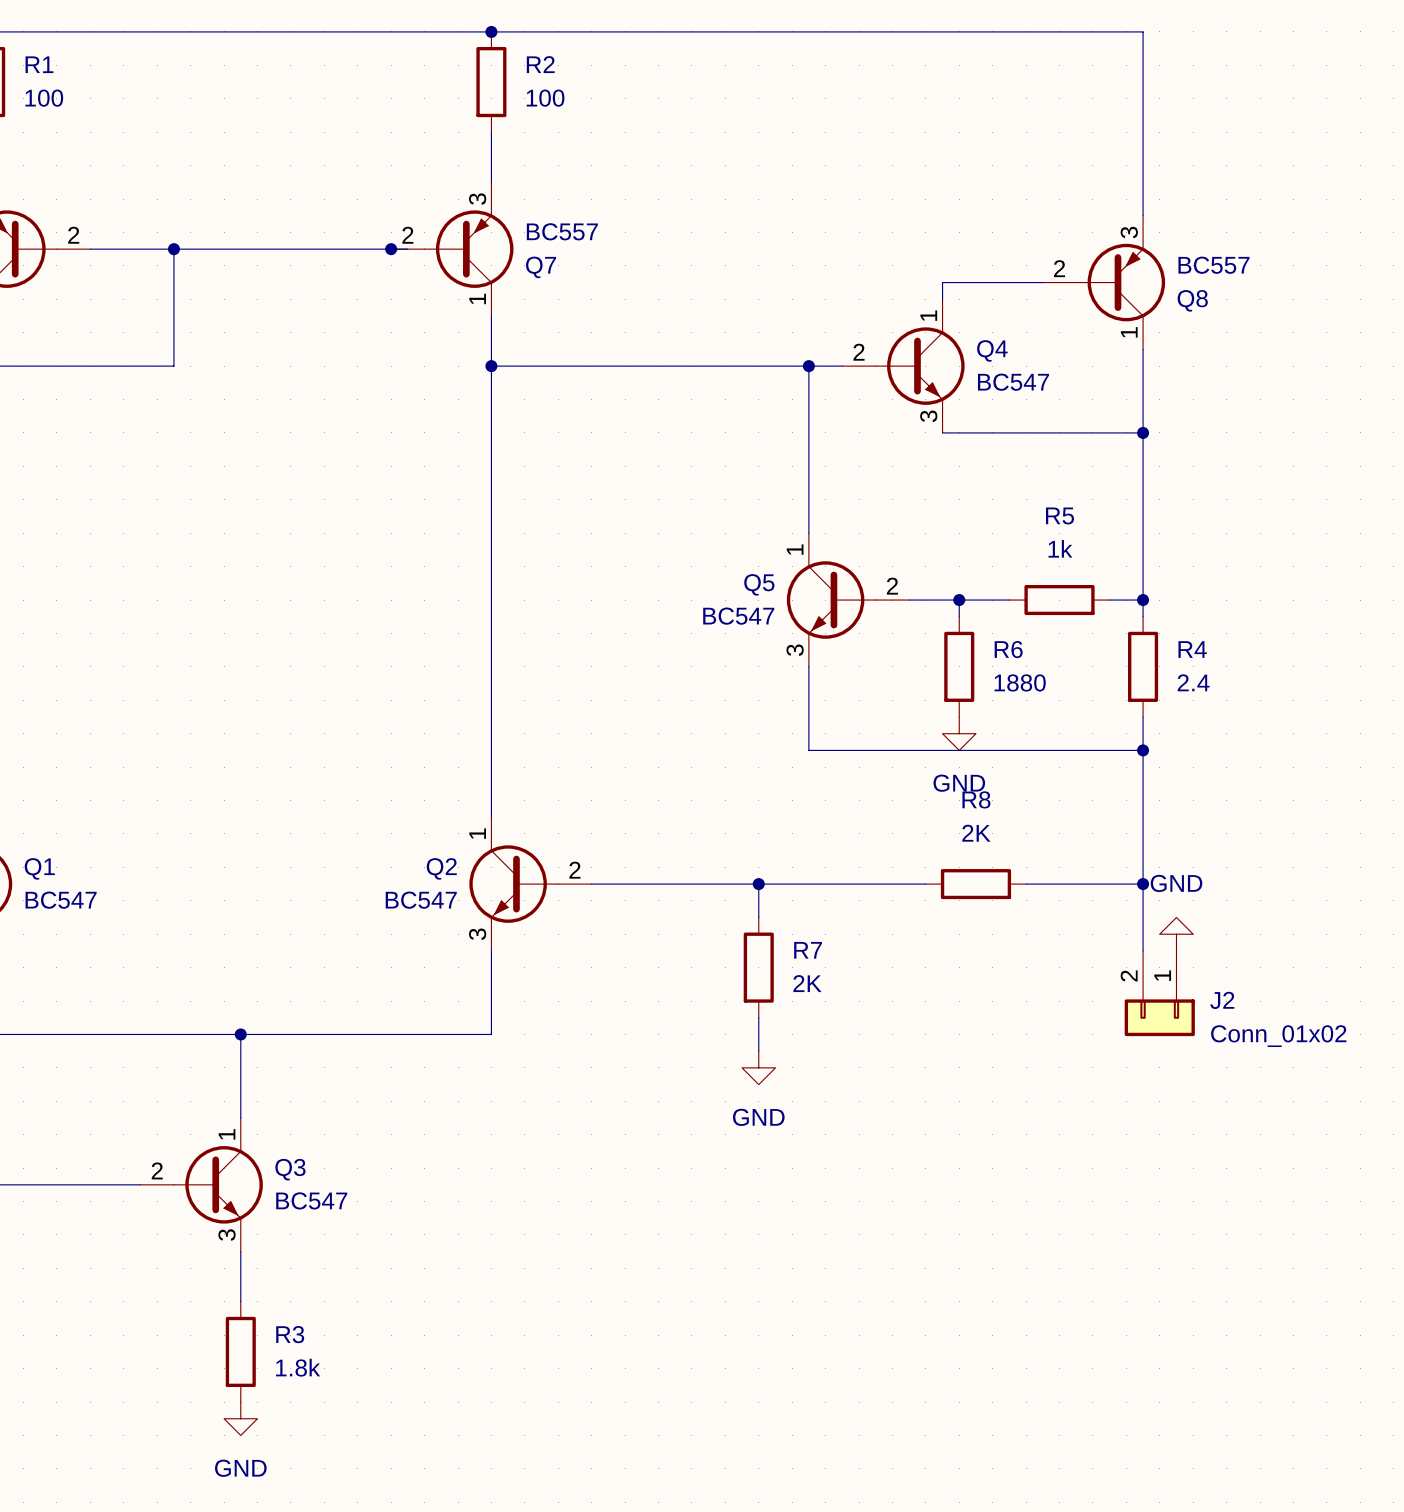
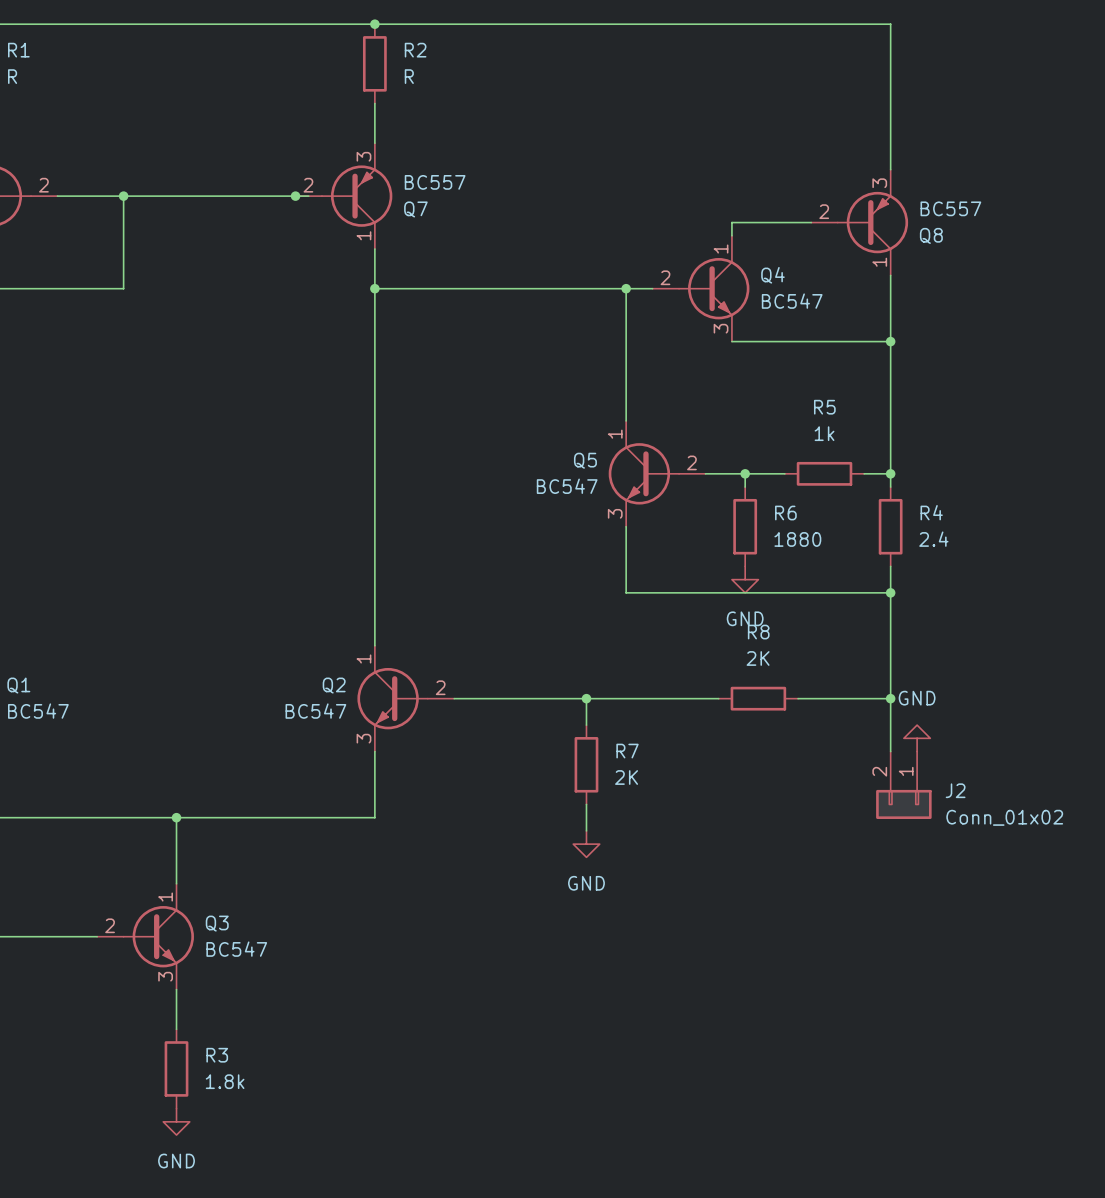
R1 value: 100 (44, 98) -> R (12, 76)
R2 value: 100 (545, 98) -> R (409, 76)

